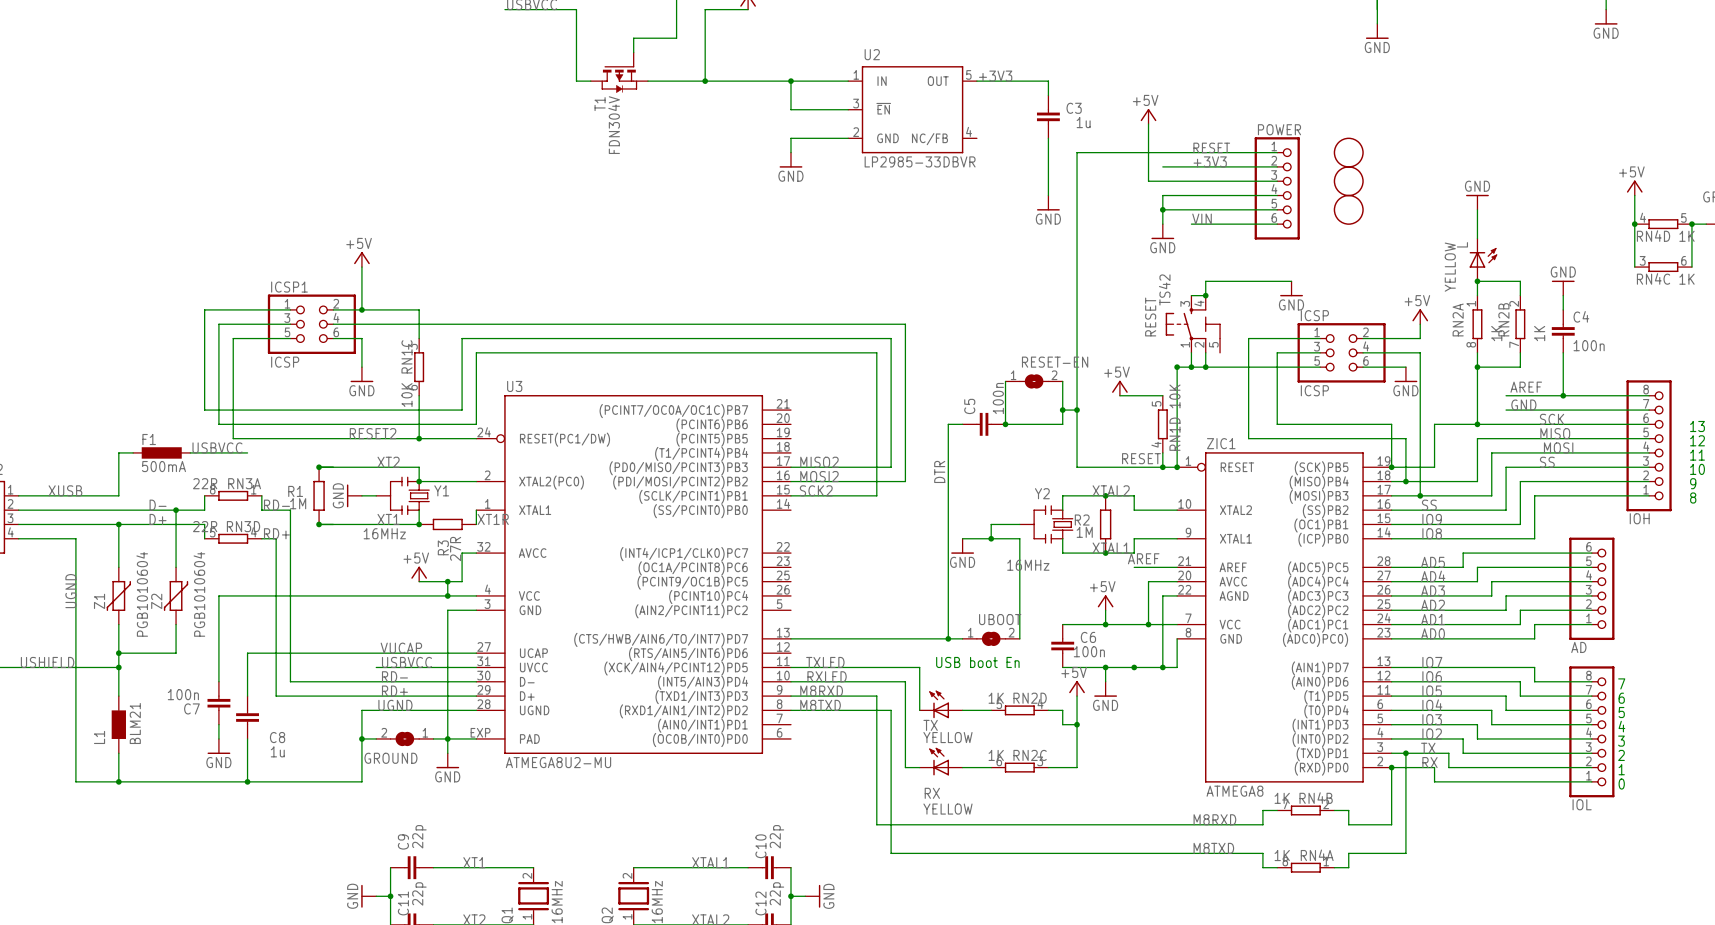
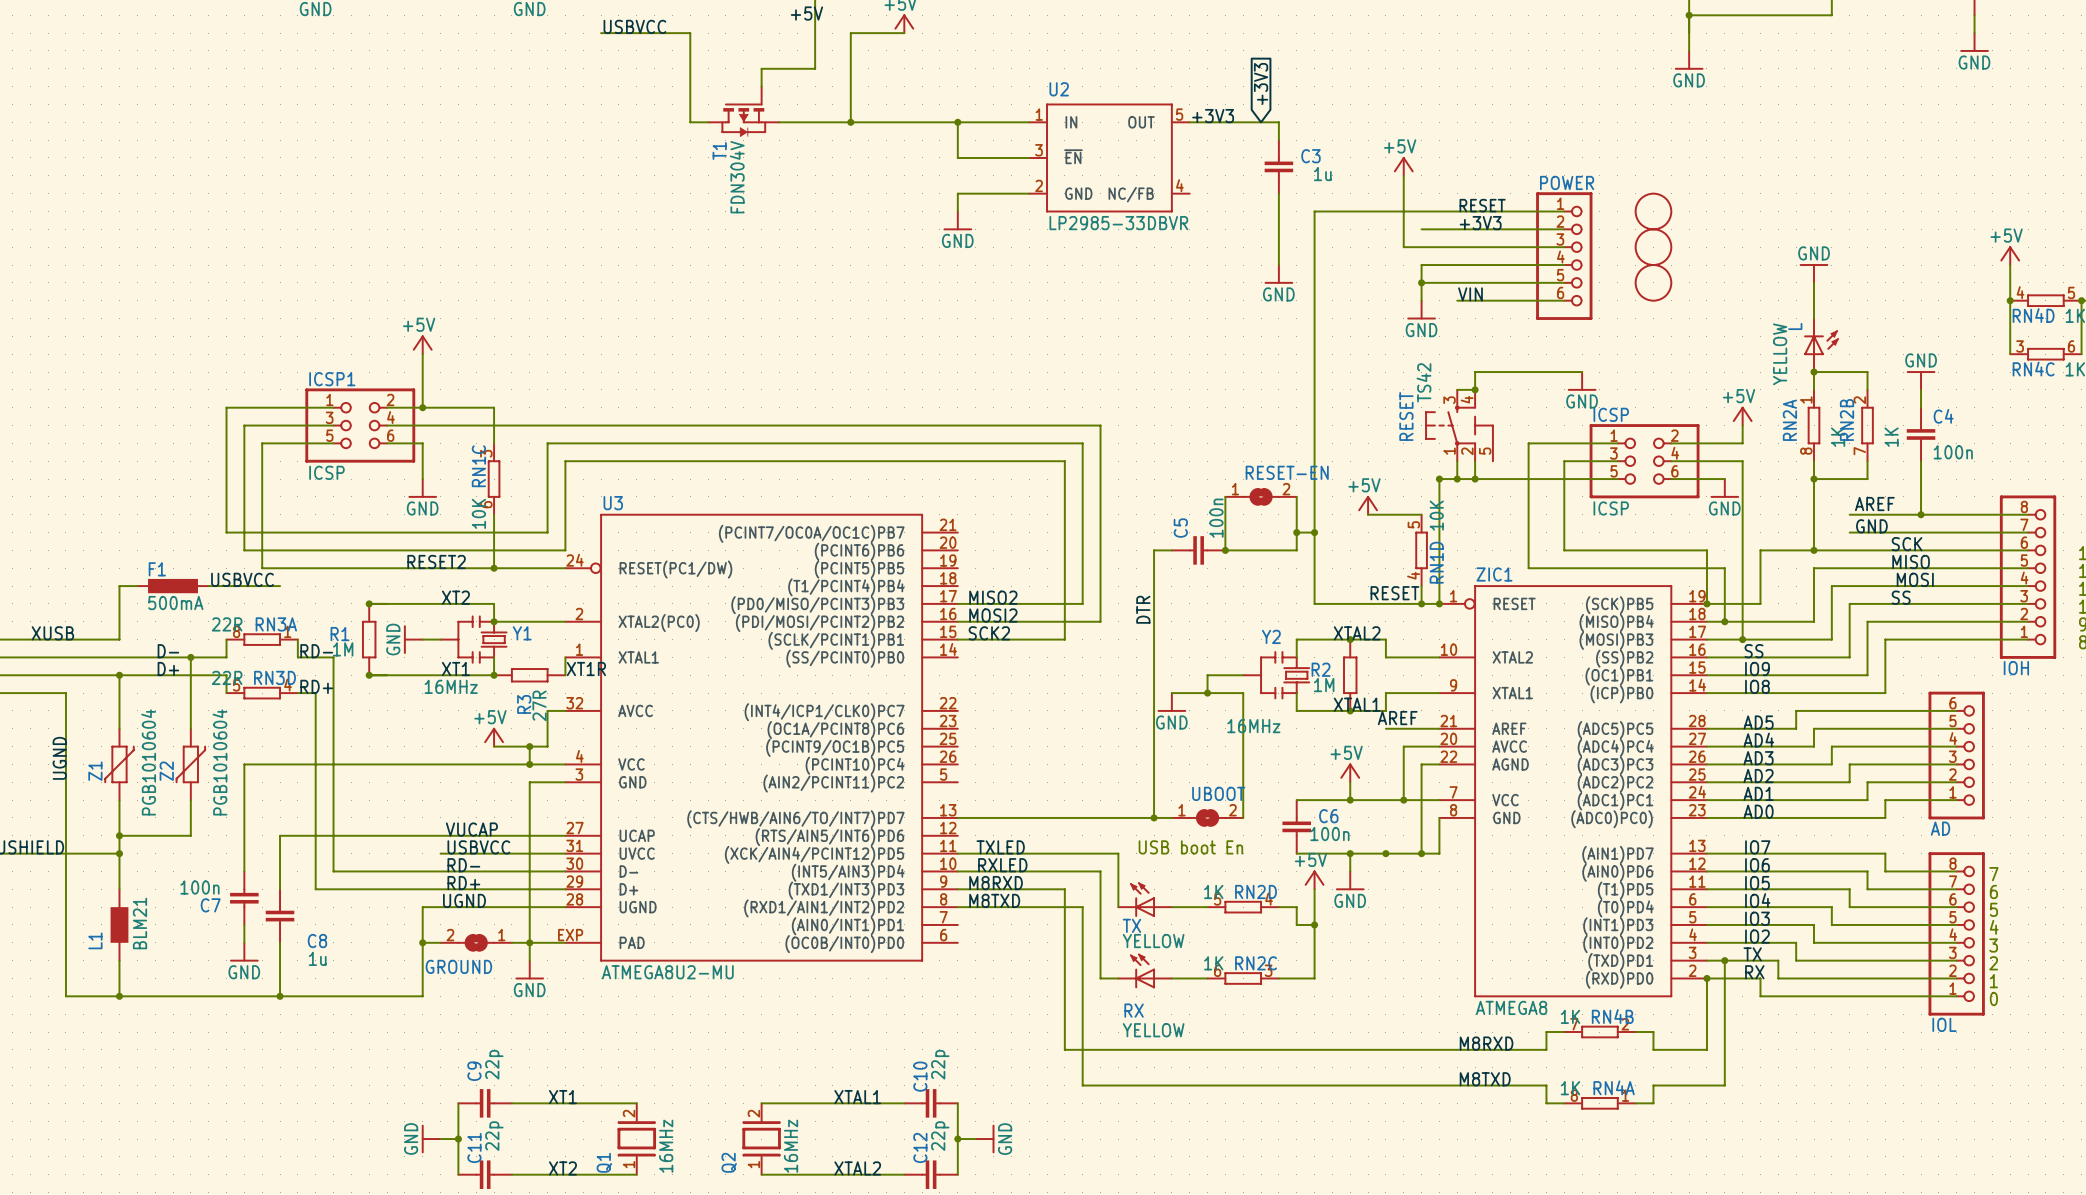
global label: none -> +3V3 (1261, 83)

